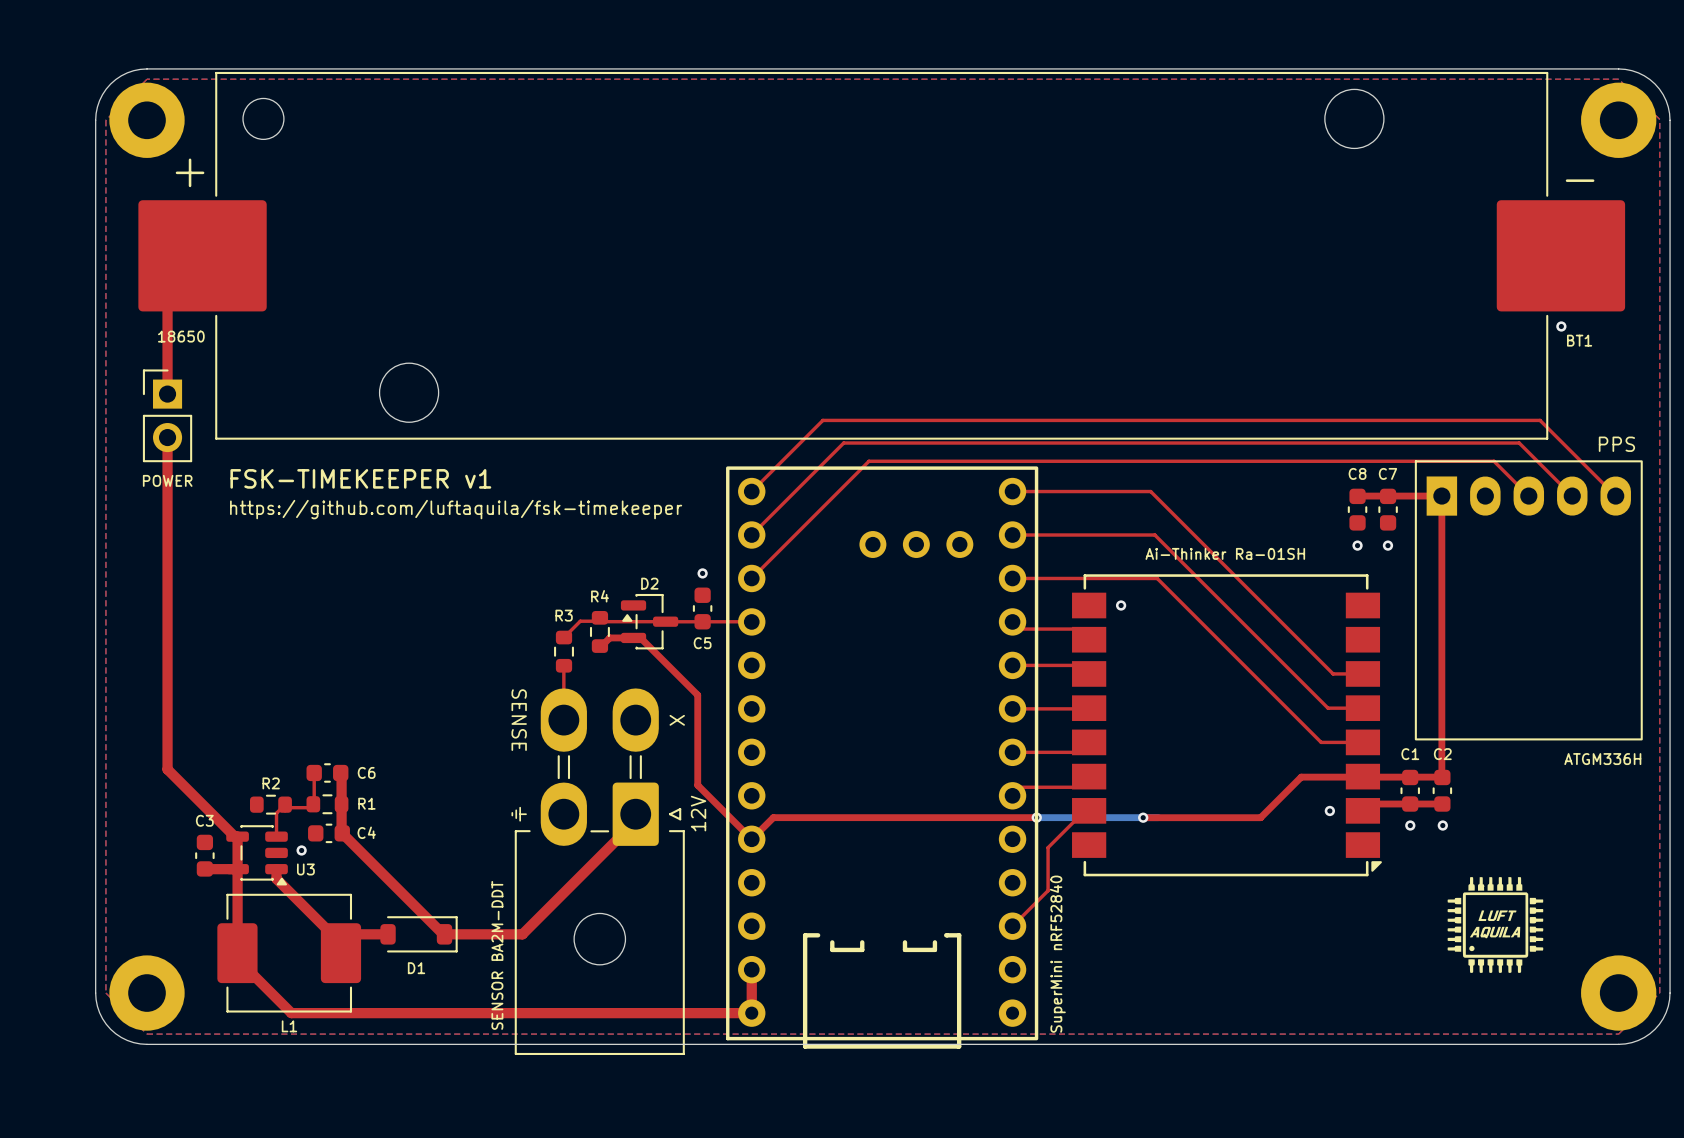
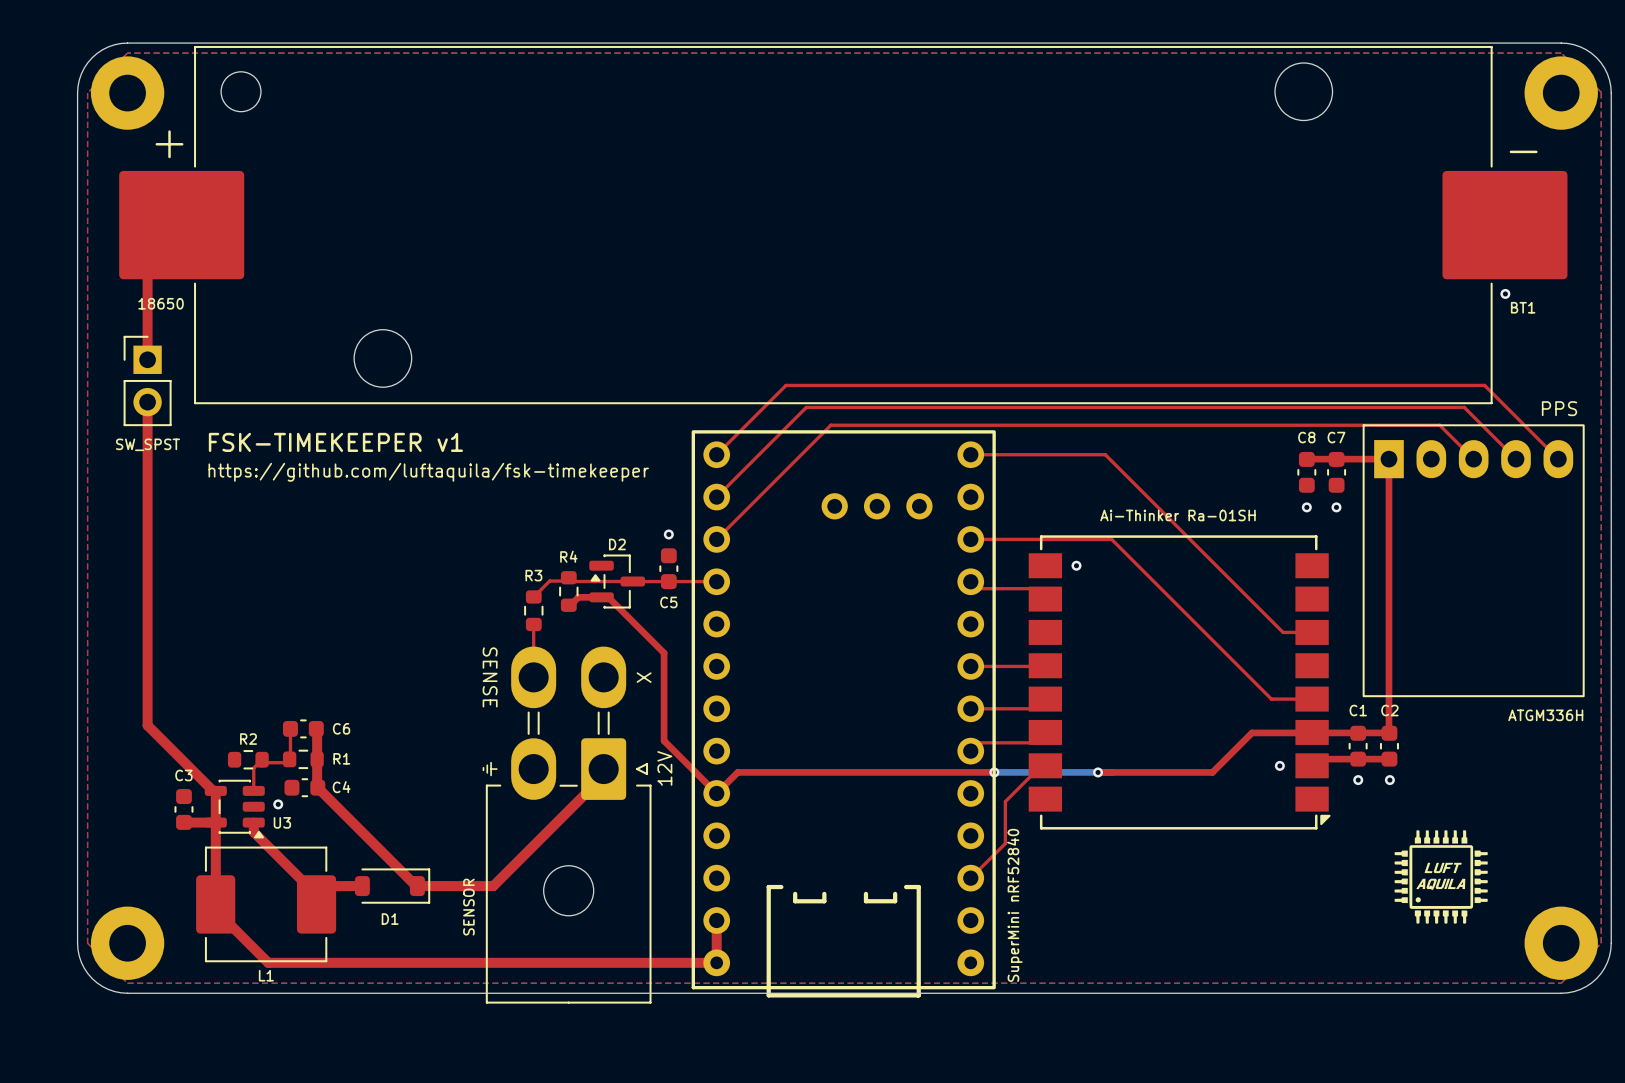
part value: POWER (167, 480) -> SW_SPST (147, 444)
top track: (1012, 535) (1154, 535) (1328, 708) (1362, 708) -> none
top track: (1012, 665) (1095, 665) -> none
part value: SENSOR BA2M-DDT (497, 955) -> SENSOR (468, 907)

